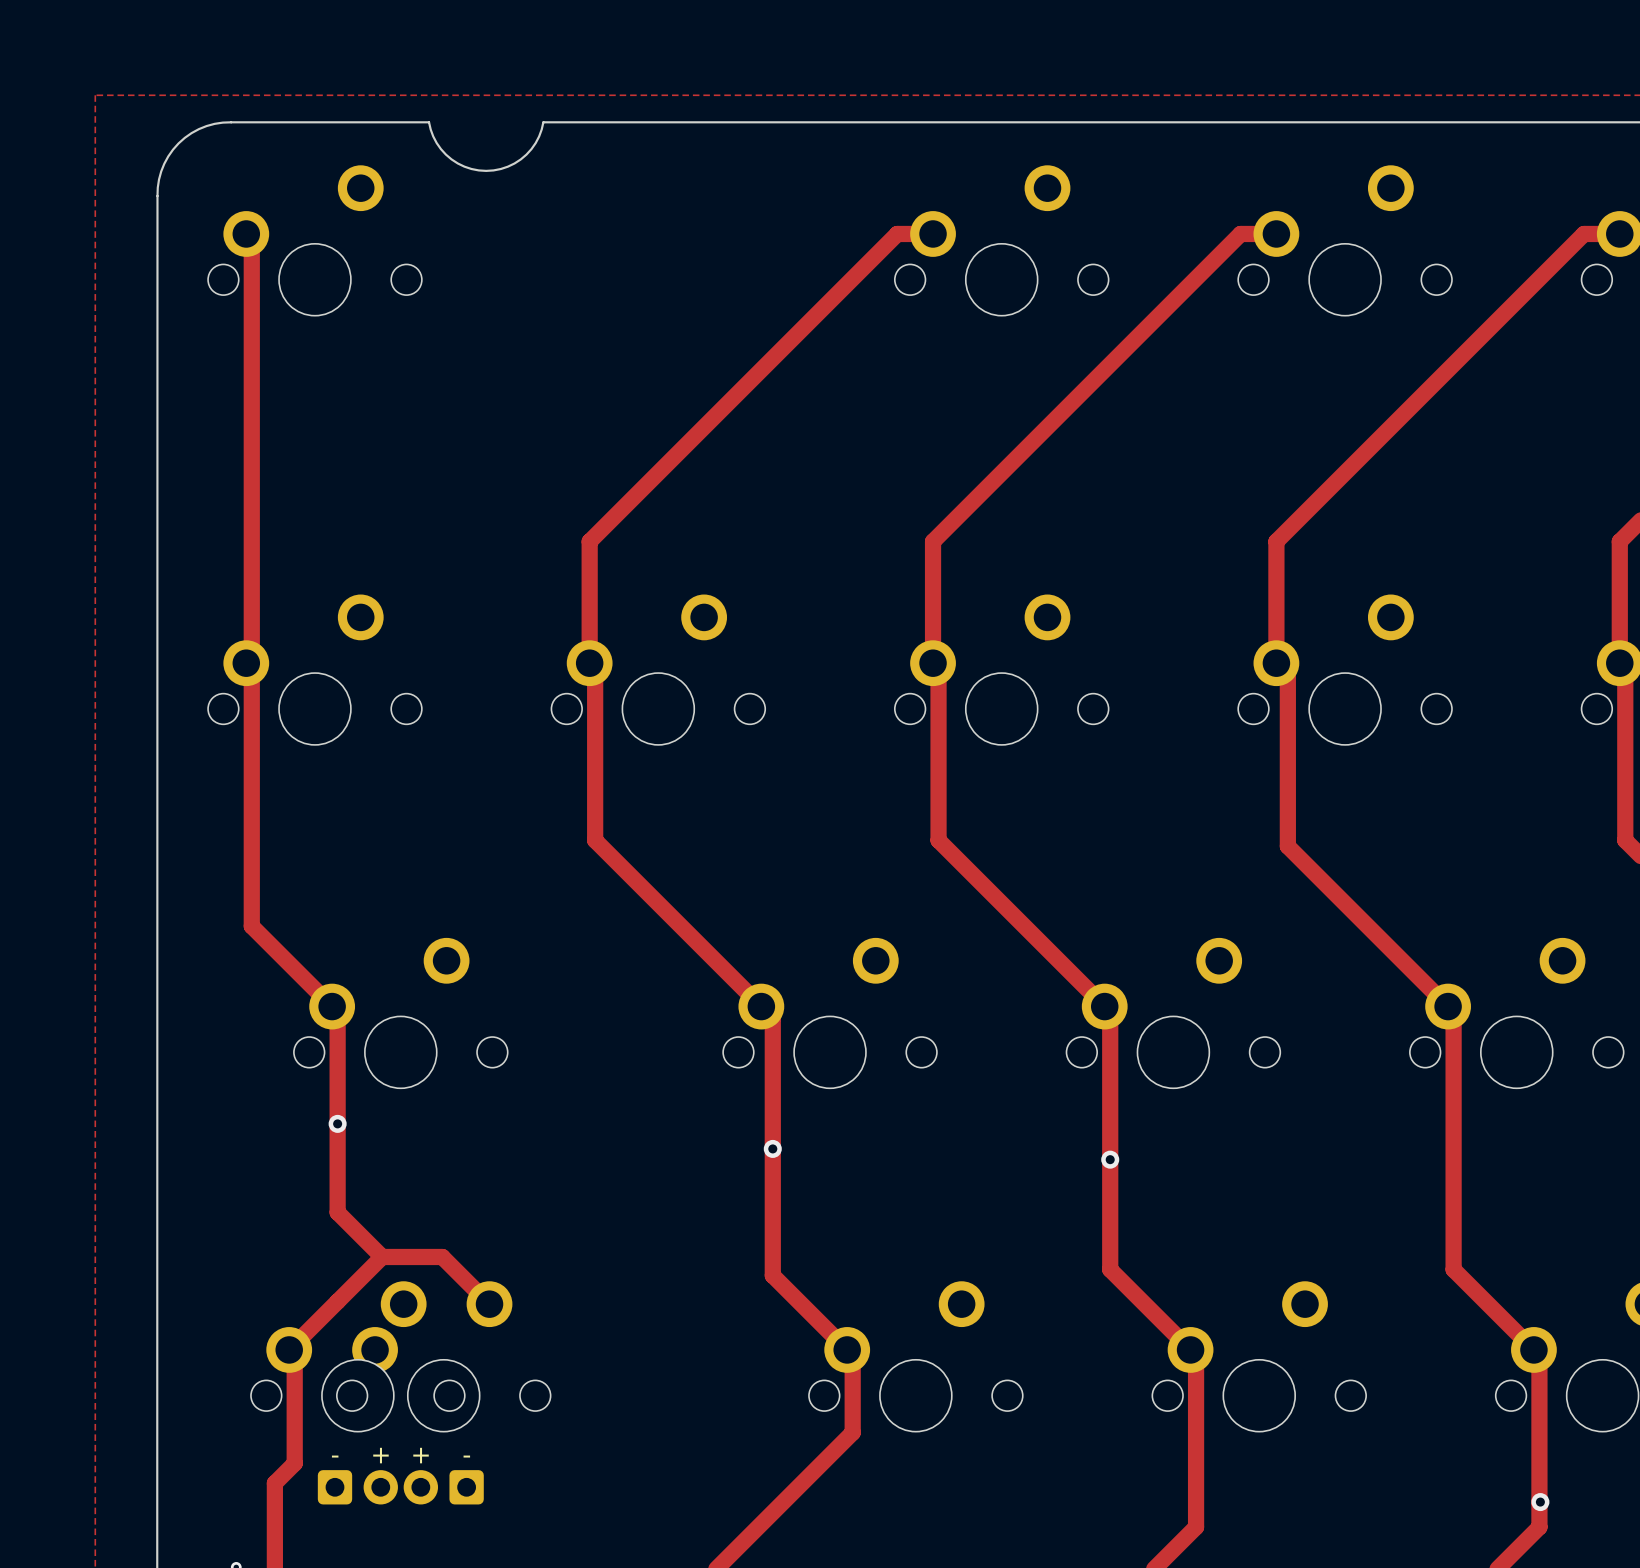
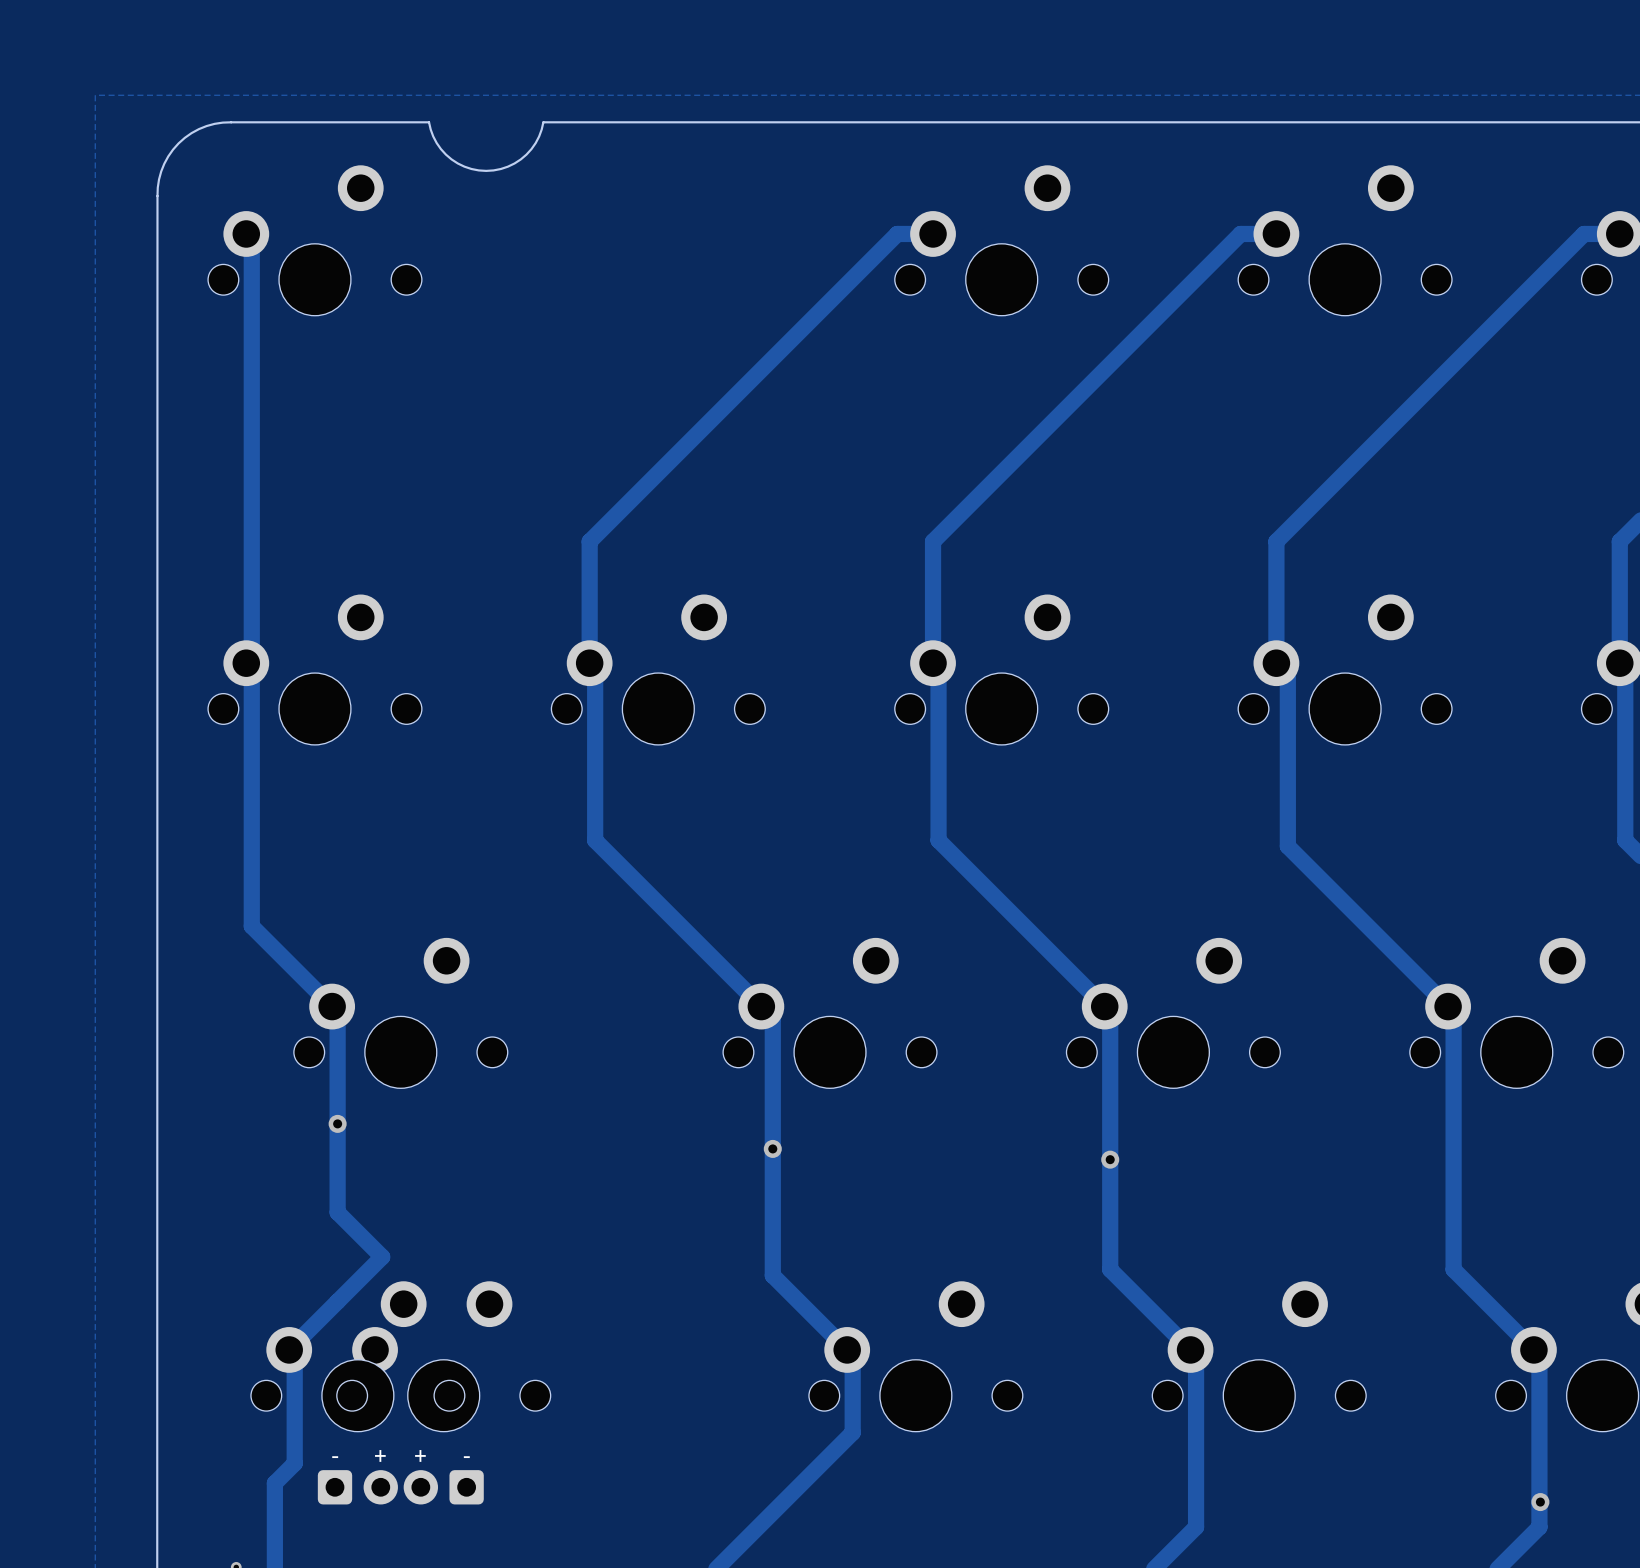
track: (382, 1256) (442, 1256) (489, 1304) -> none

